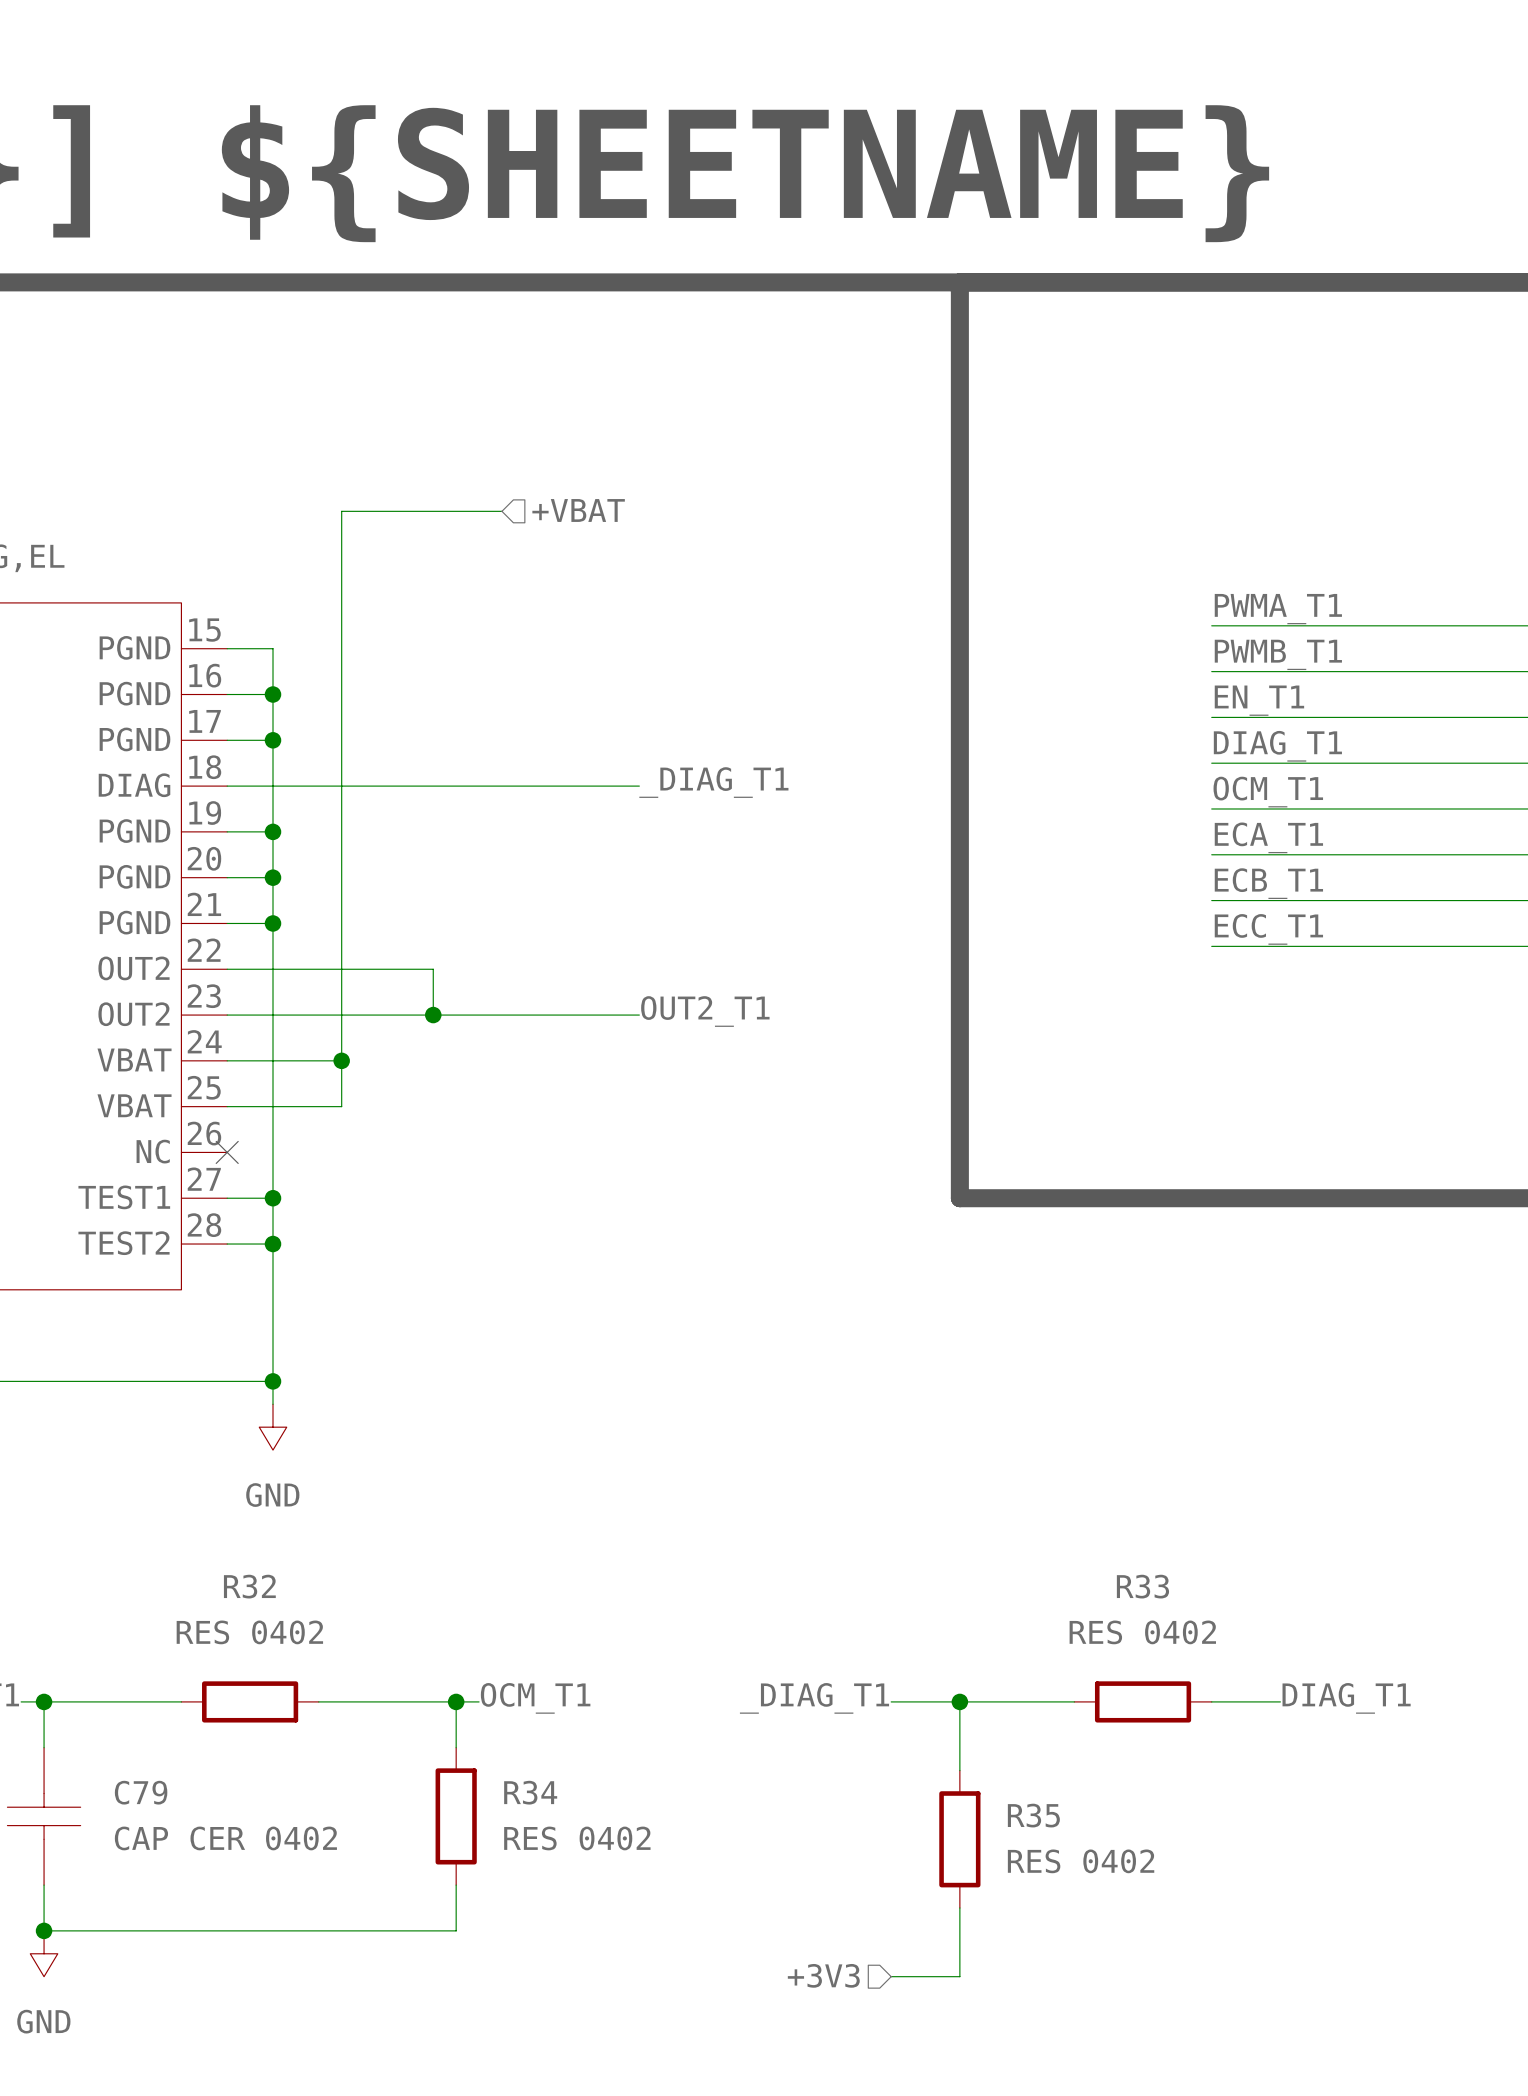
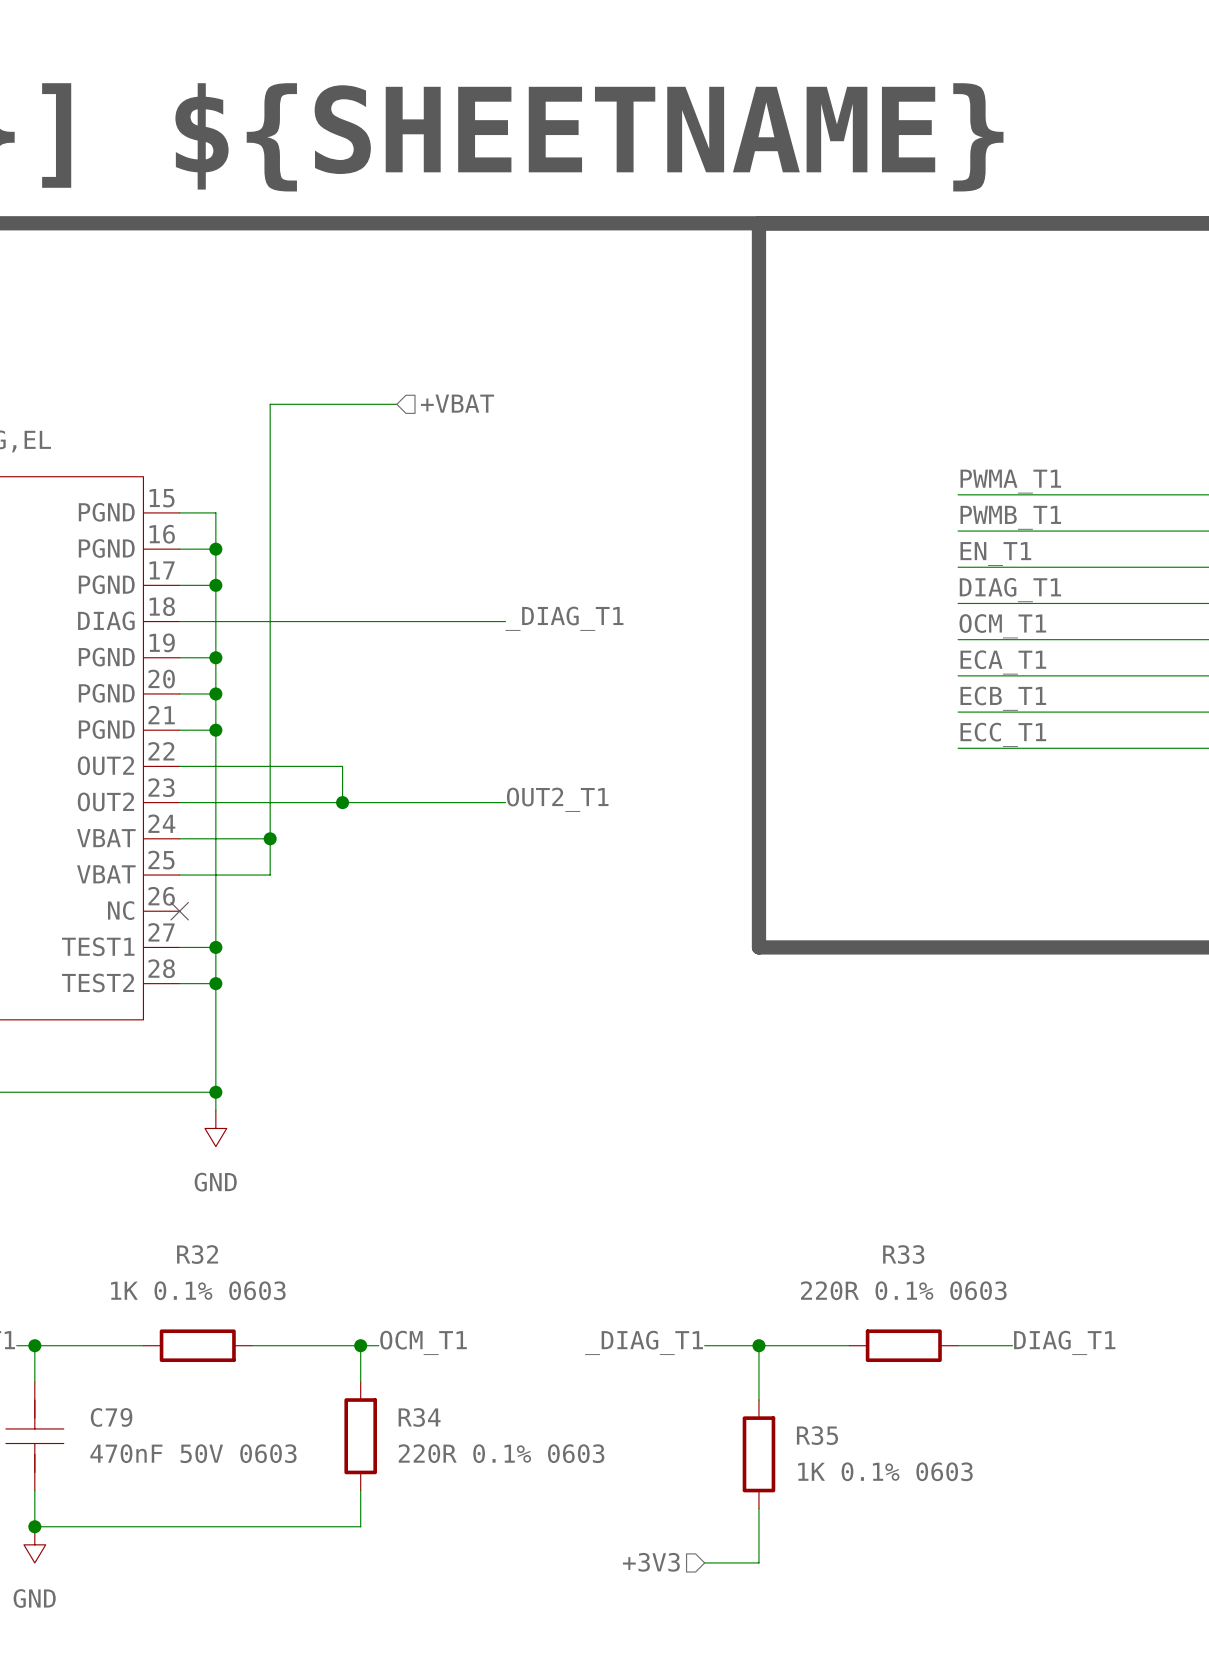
R32 value: RES 0402 (249, 1632) -> 1K 0.1% 0603 (198, 1290)
R33 value: RES 0402 (1142, 1632) -> 220R 0.1% 0603 (903, 1290)
C79 symbol: [7, 1747, 81, 1886] -> [5, 1381, 64, 1491]
C79 value: CAP CER 0402 (225, 1838) -> 470nF 50V 0603 (193, 1453)
R34 value: RES 0402 (577, 1838) -> 220R 0.1% 0603 (501, 1453)
R35 value: RES 0402 (1081, 1861) -> 1K 0.1% 0603 (885, 1471)

